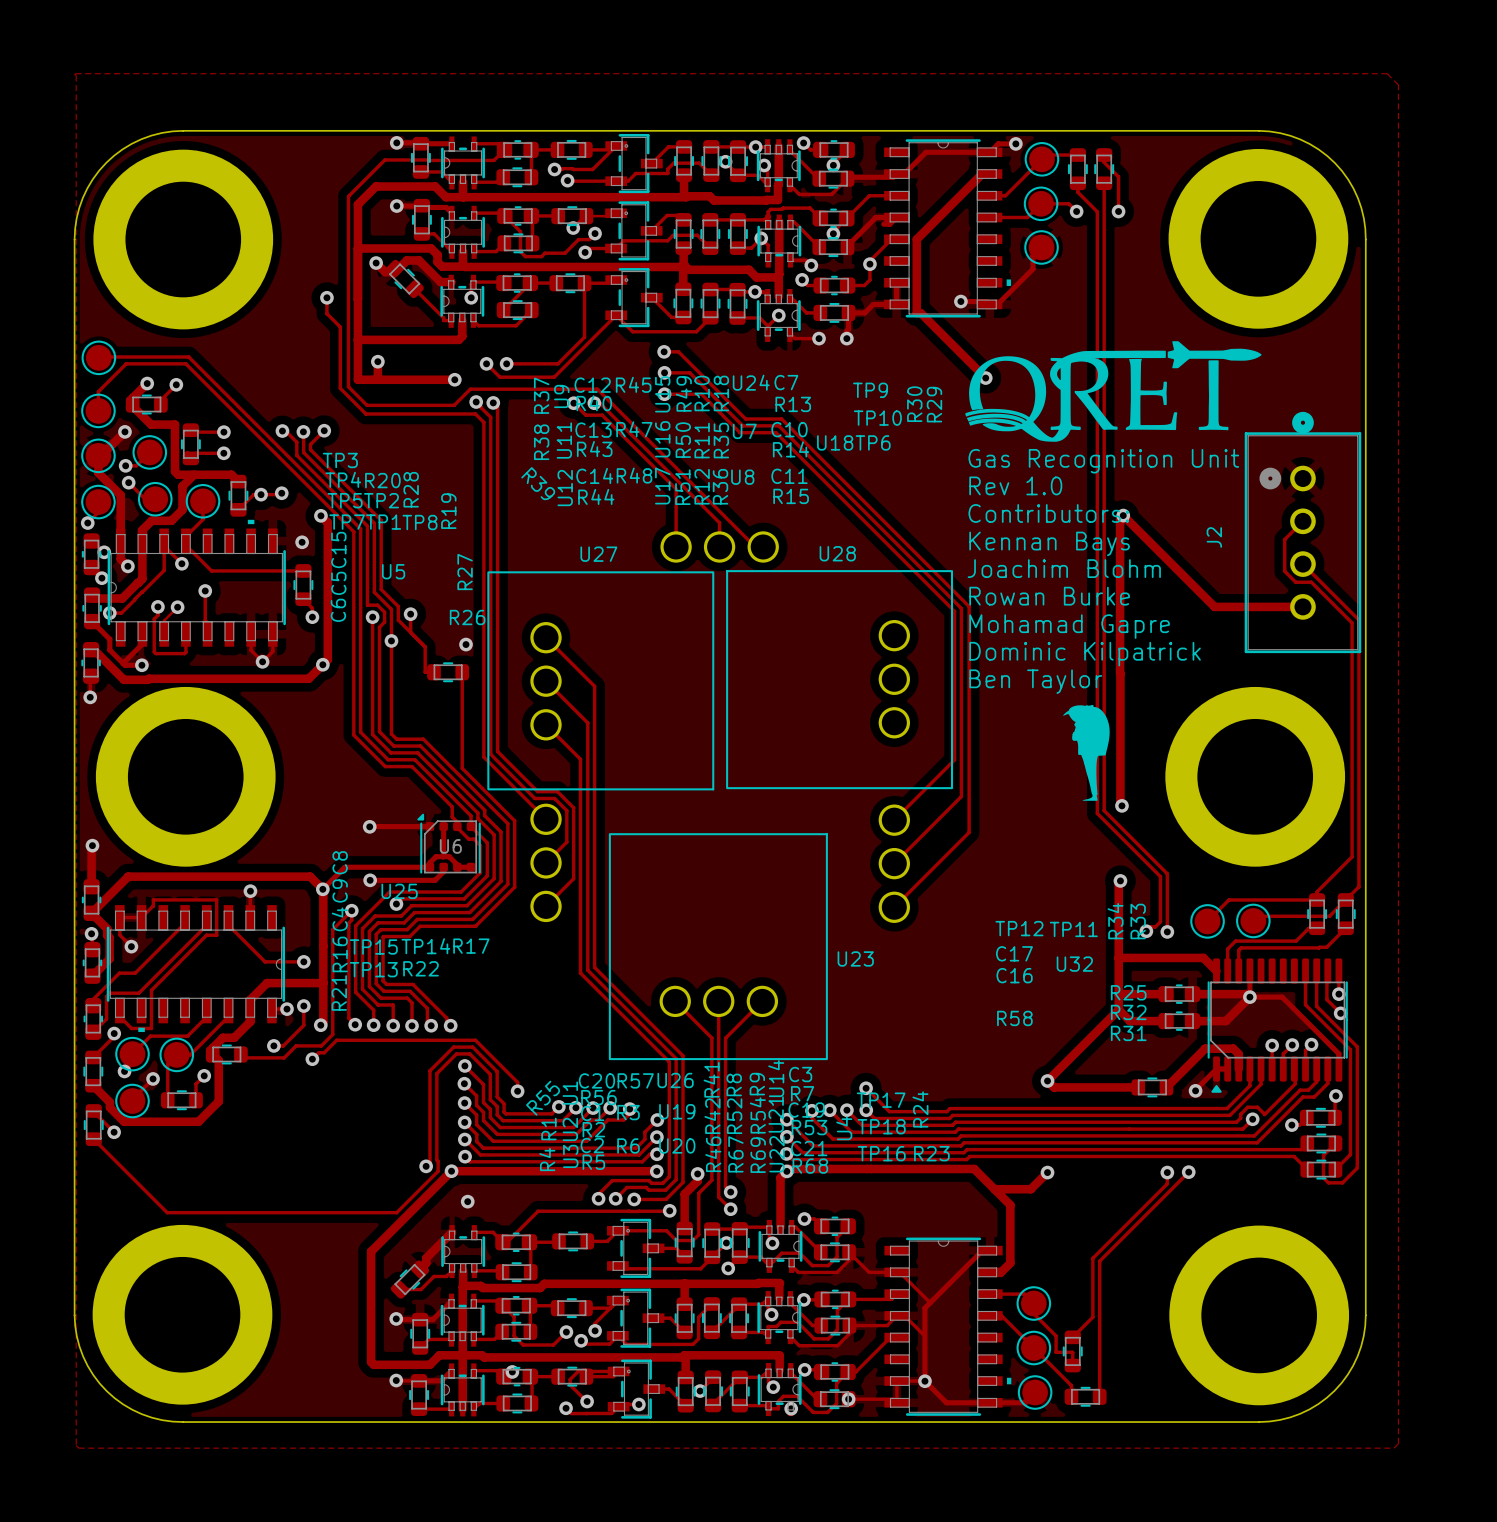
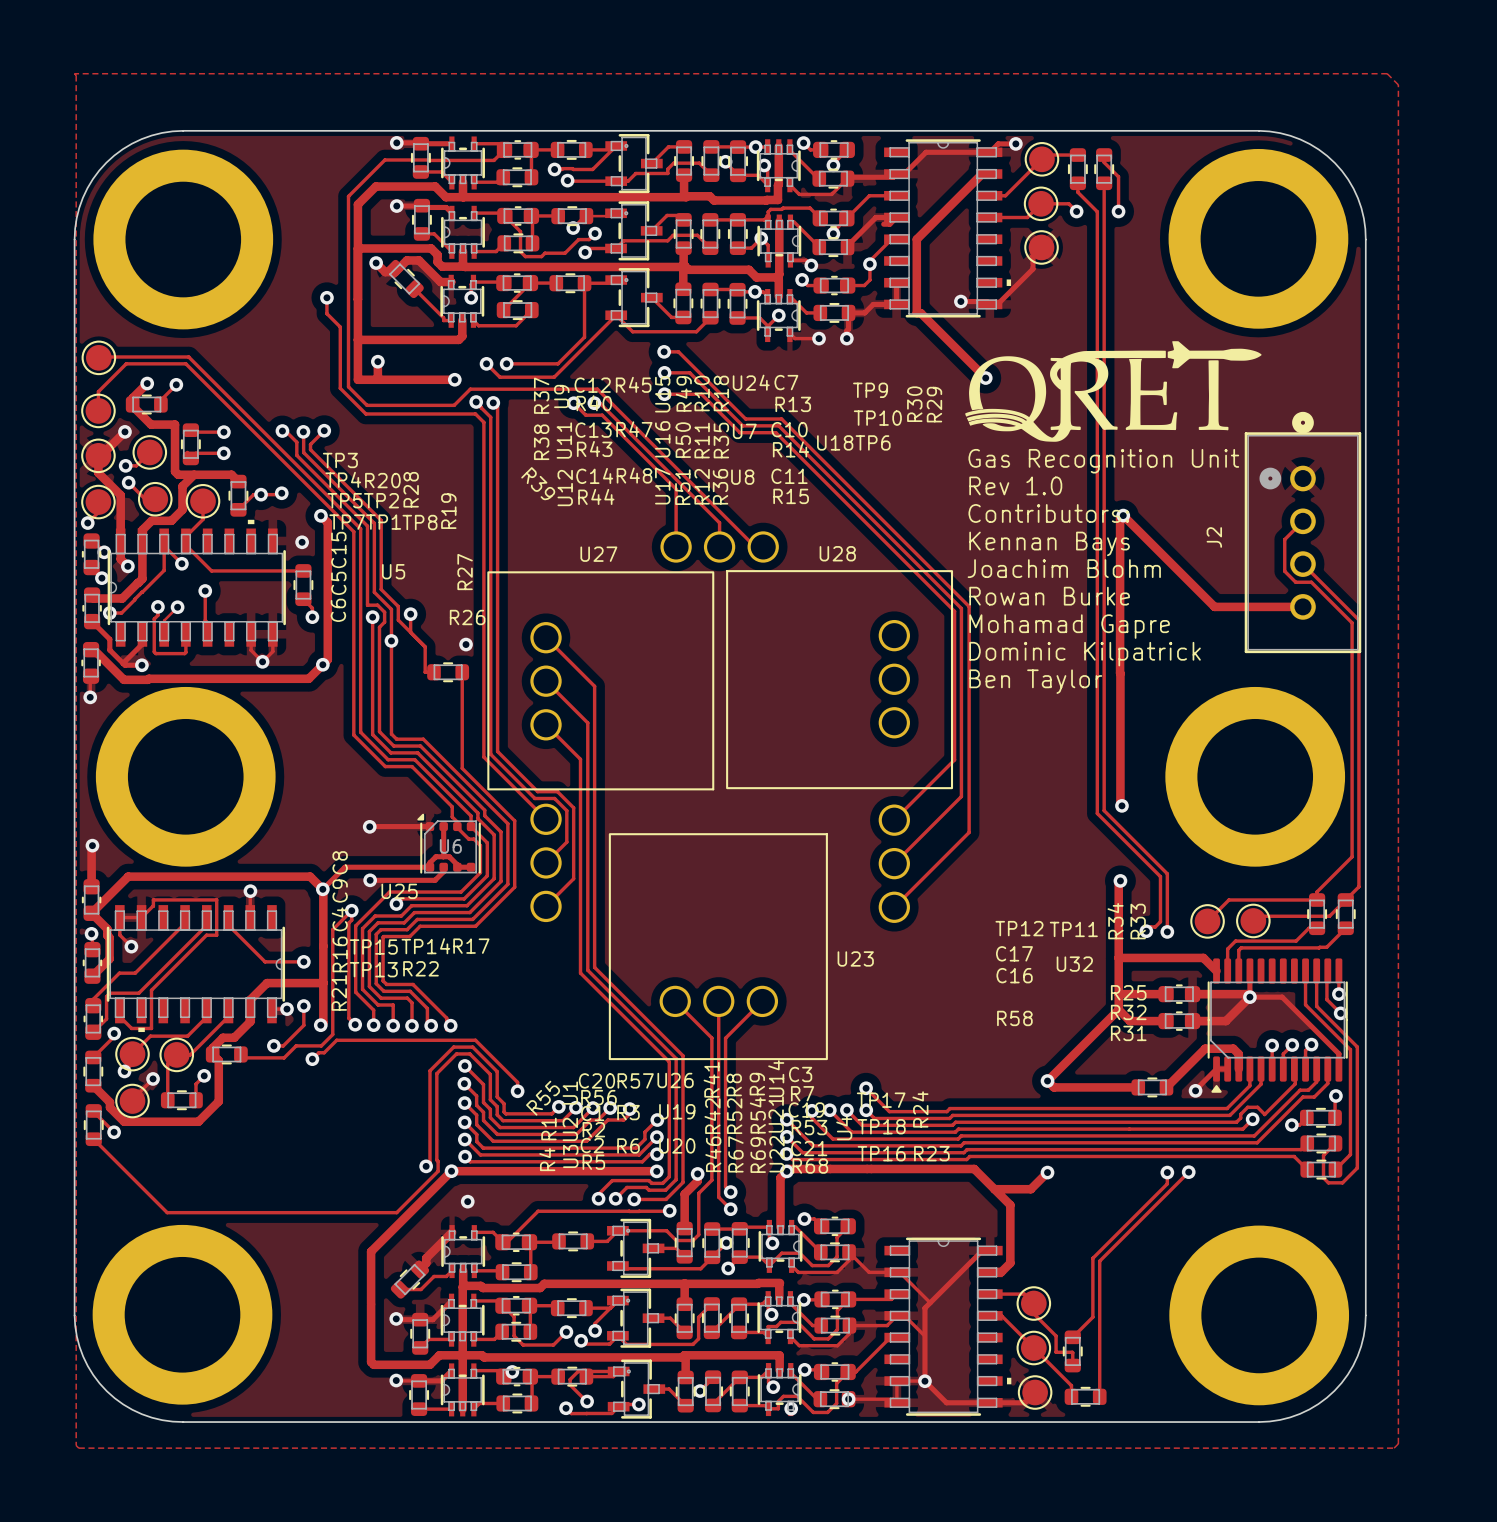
drawing: [1063, 704, 1110, 801] -> none

